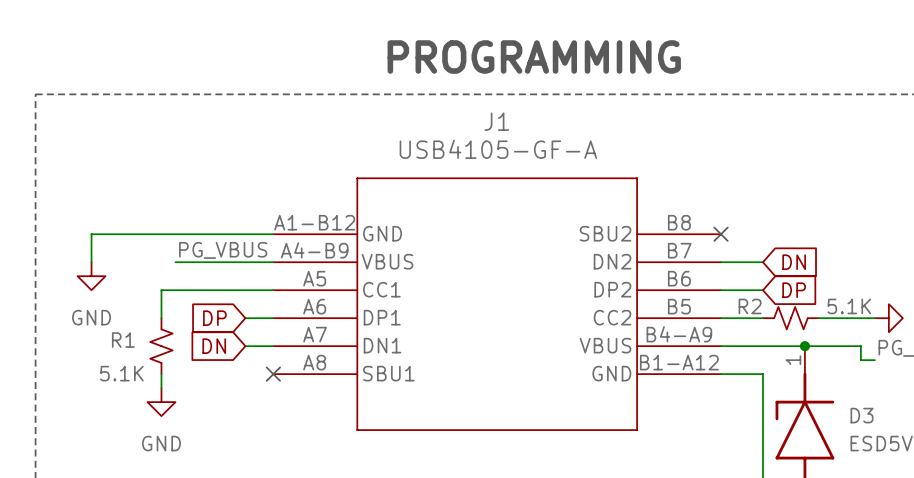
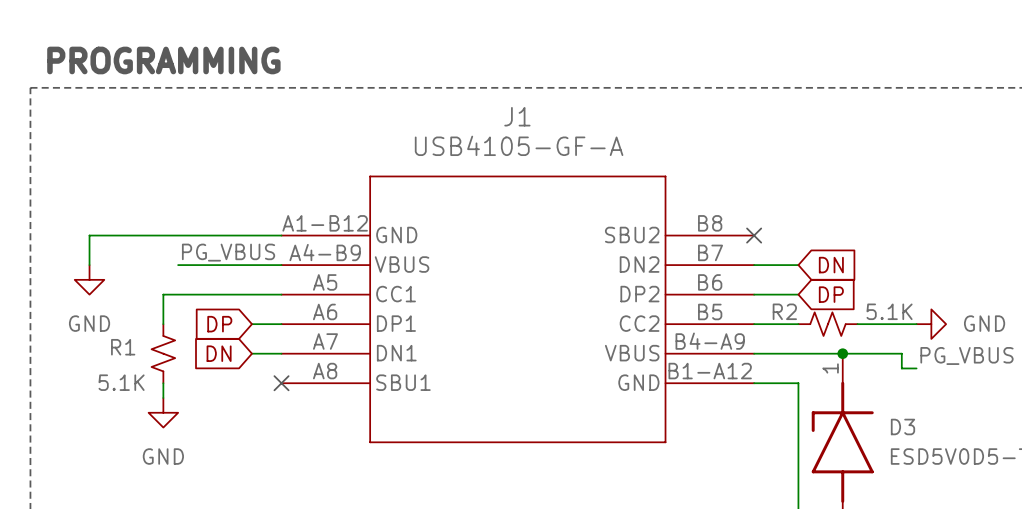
text: PROGRAMMING (534, 56) -> none
text: none -> PROGRAMMING (163, 60)

